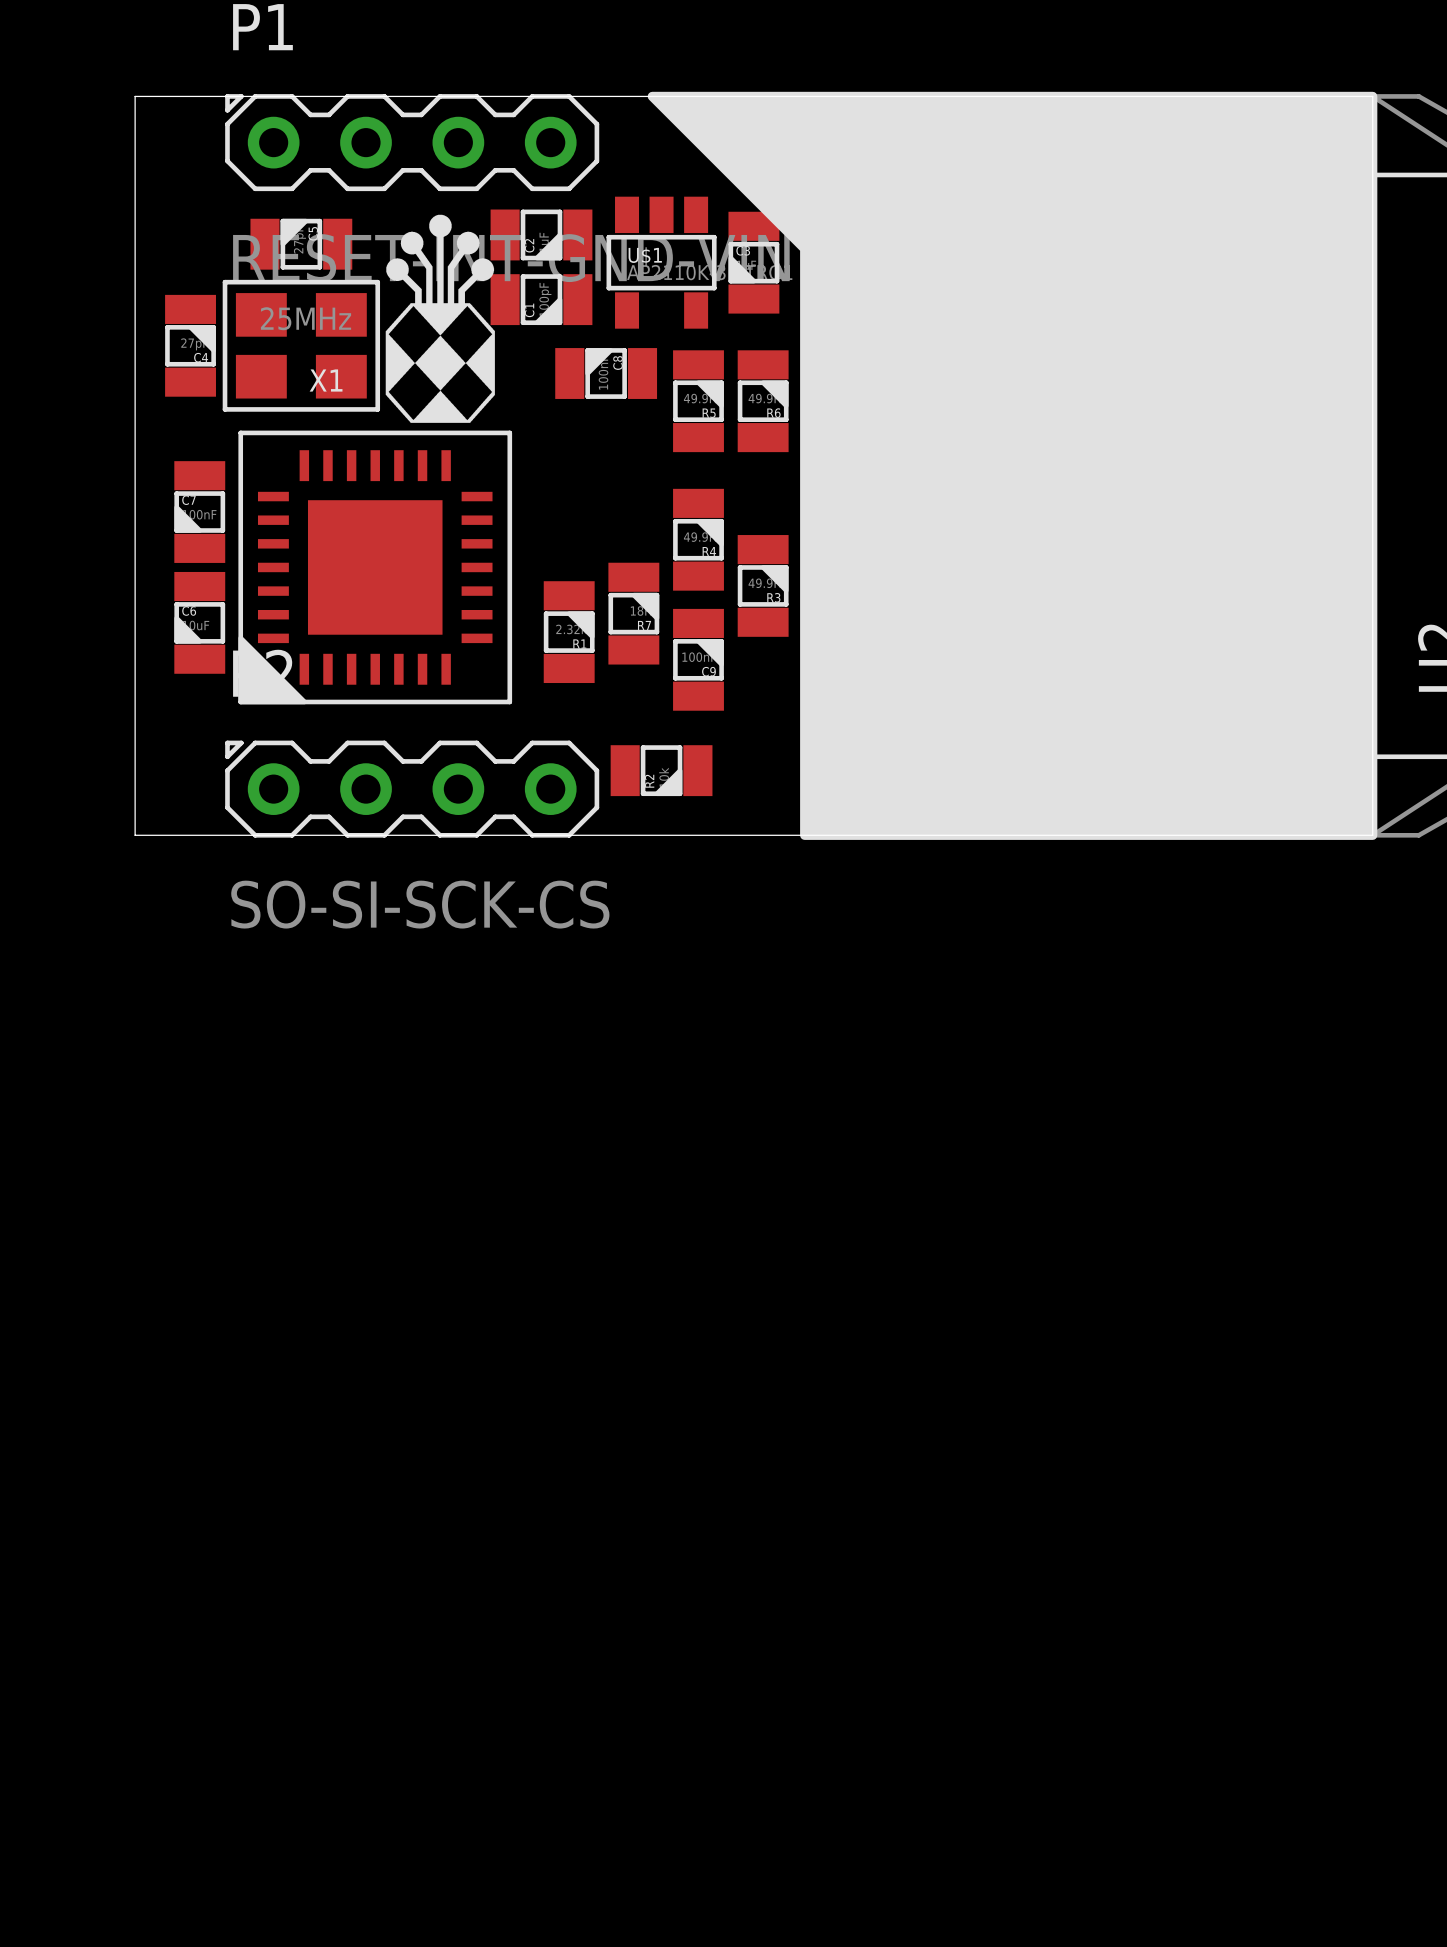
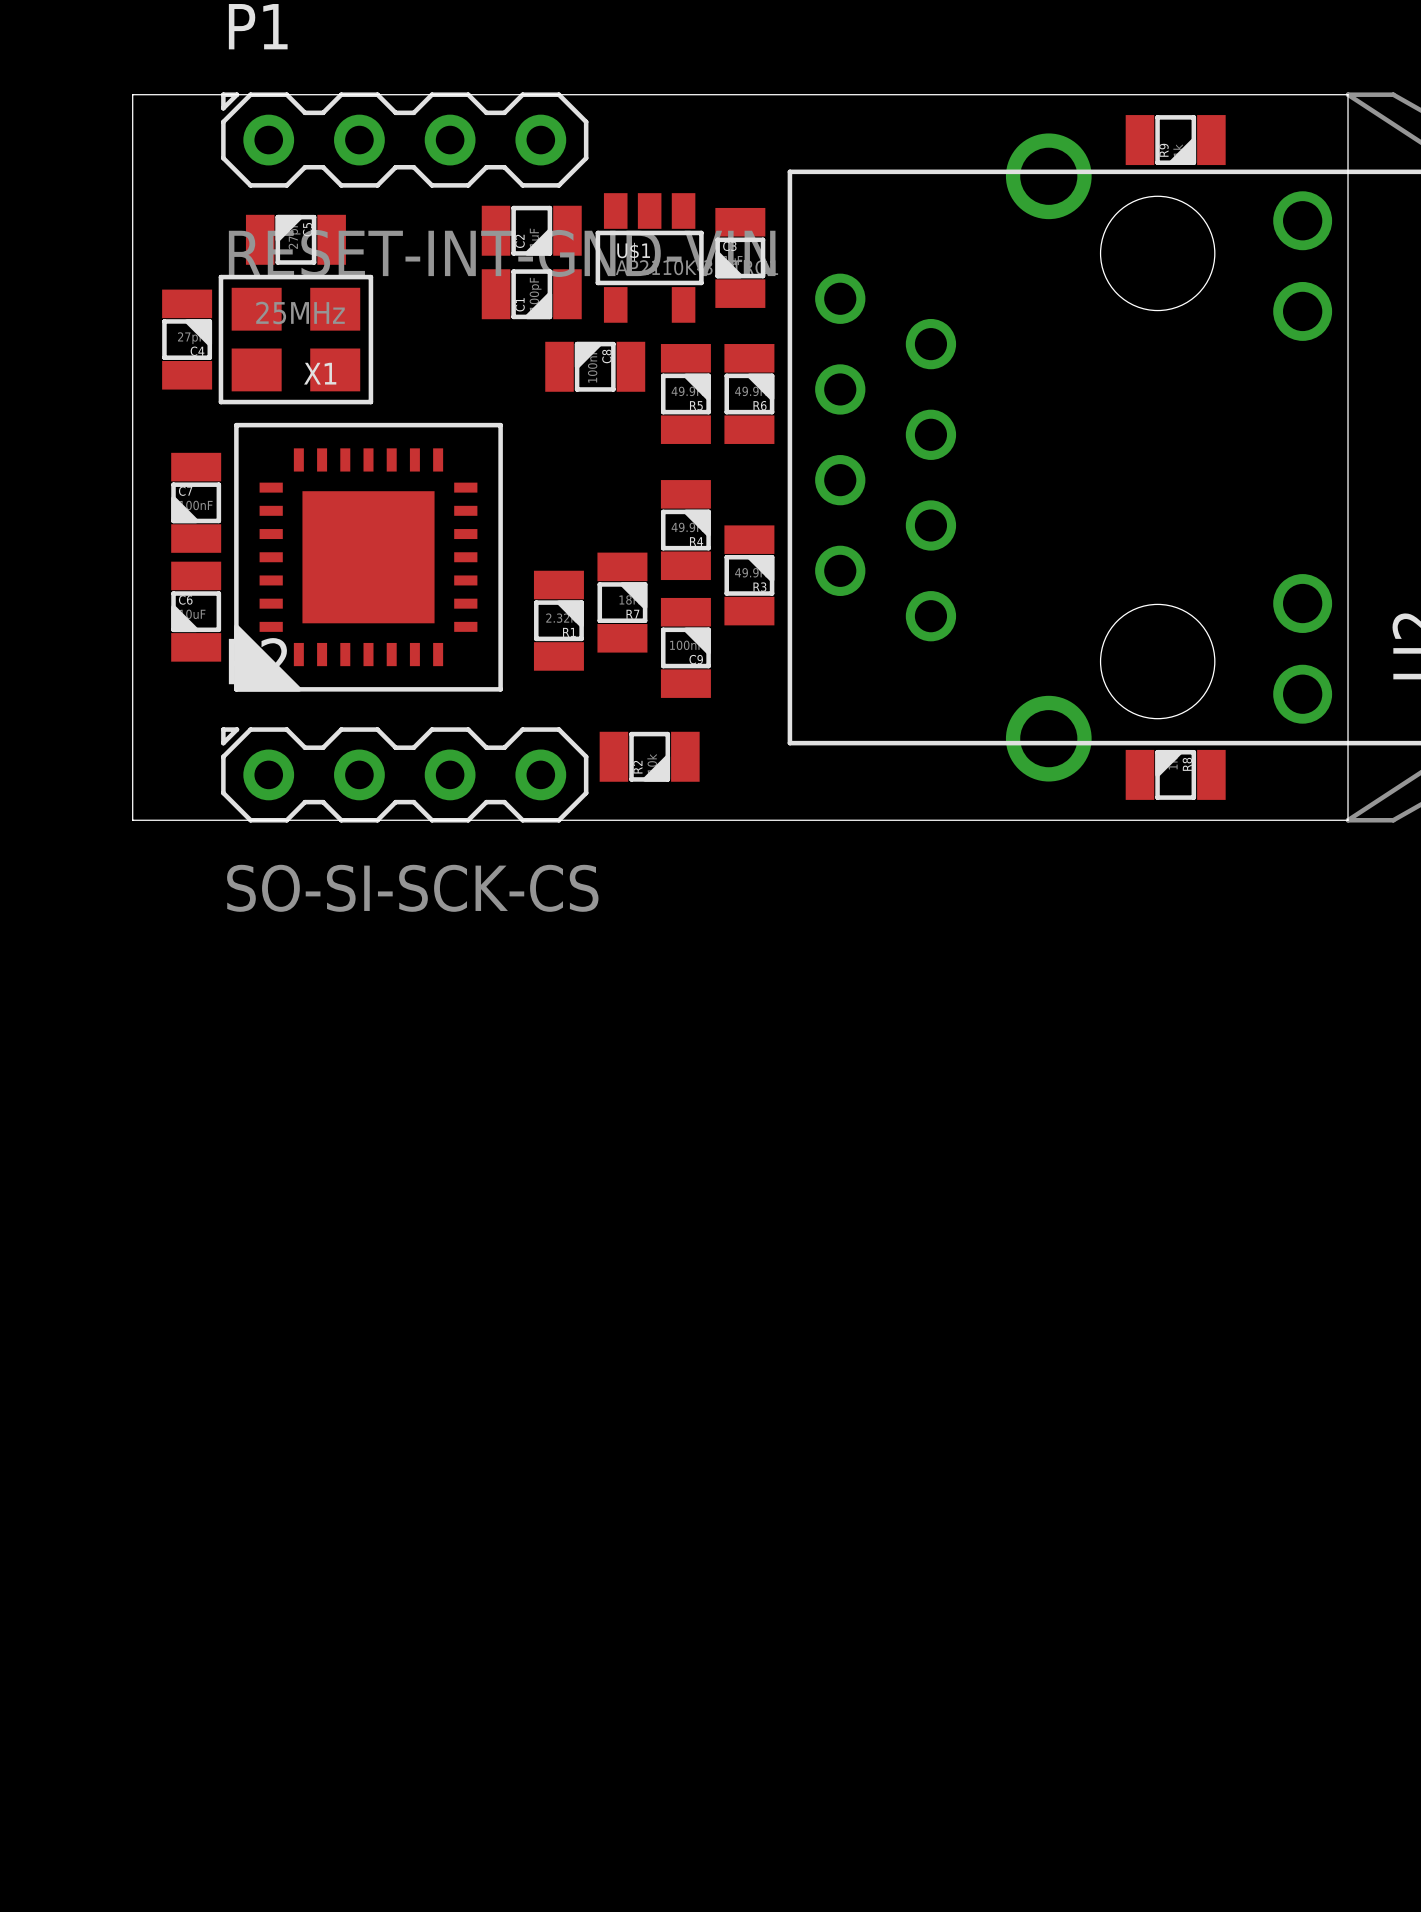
drawing: [647, 91, 1378, 840] -> none
drawing: [385, 214, 495, 423] -> none
part footprint: [238, 430, 513, 705] -> [234, 422, 503, 692]

